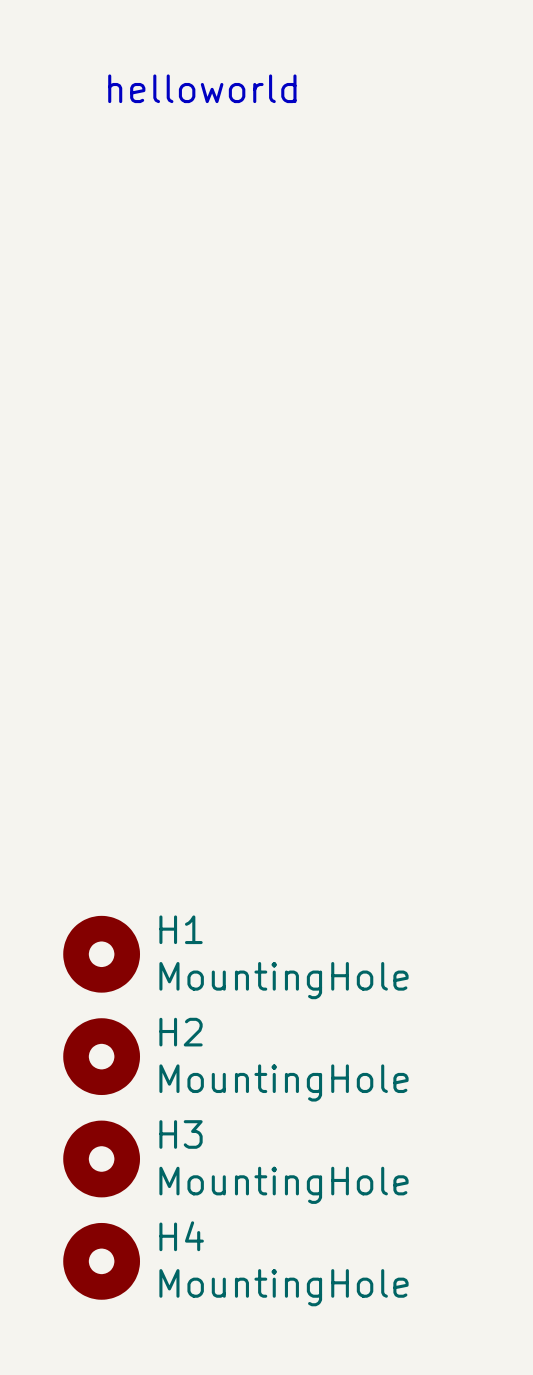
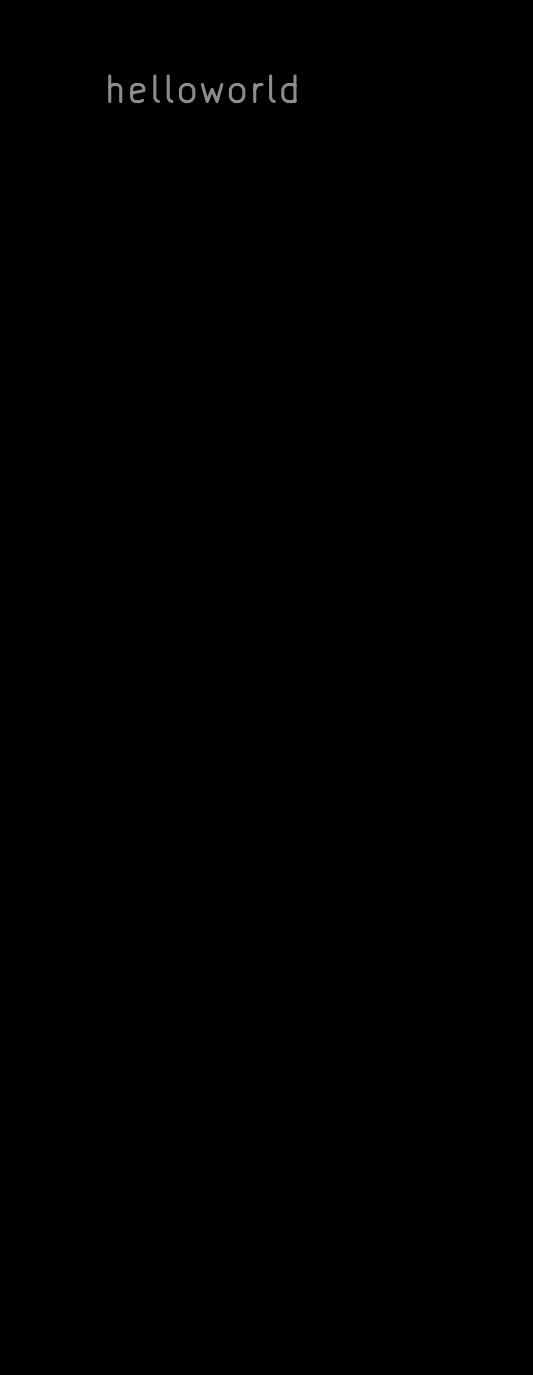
H1: MountingHole (101, 954) -> none
H2: MountingHole (101, 1056) -> none
H3: MountingHole (101, 1158) -> none
H4: MountingHole (101, 1261) -> none

